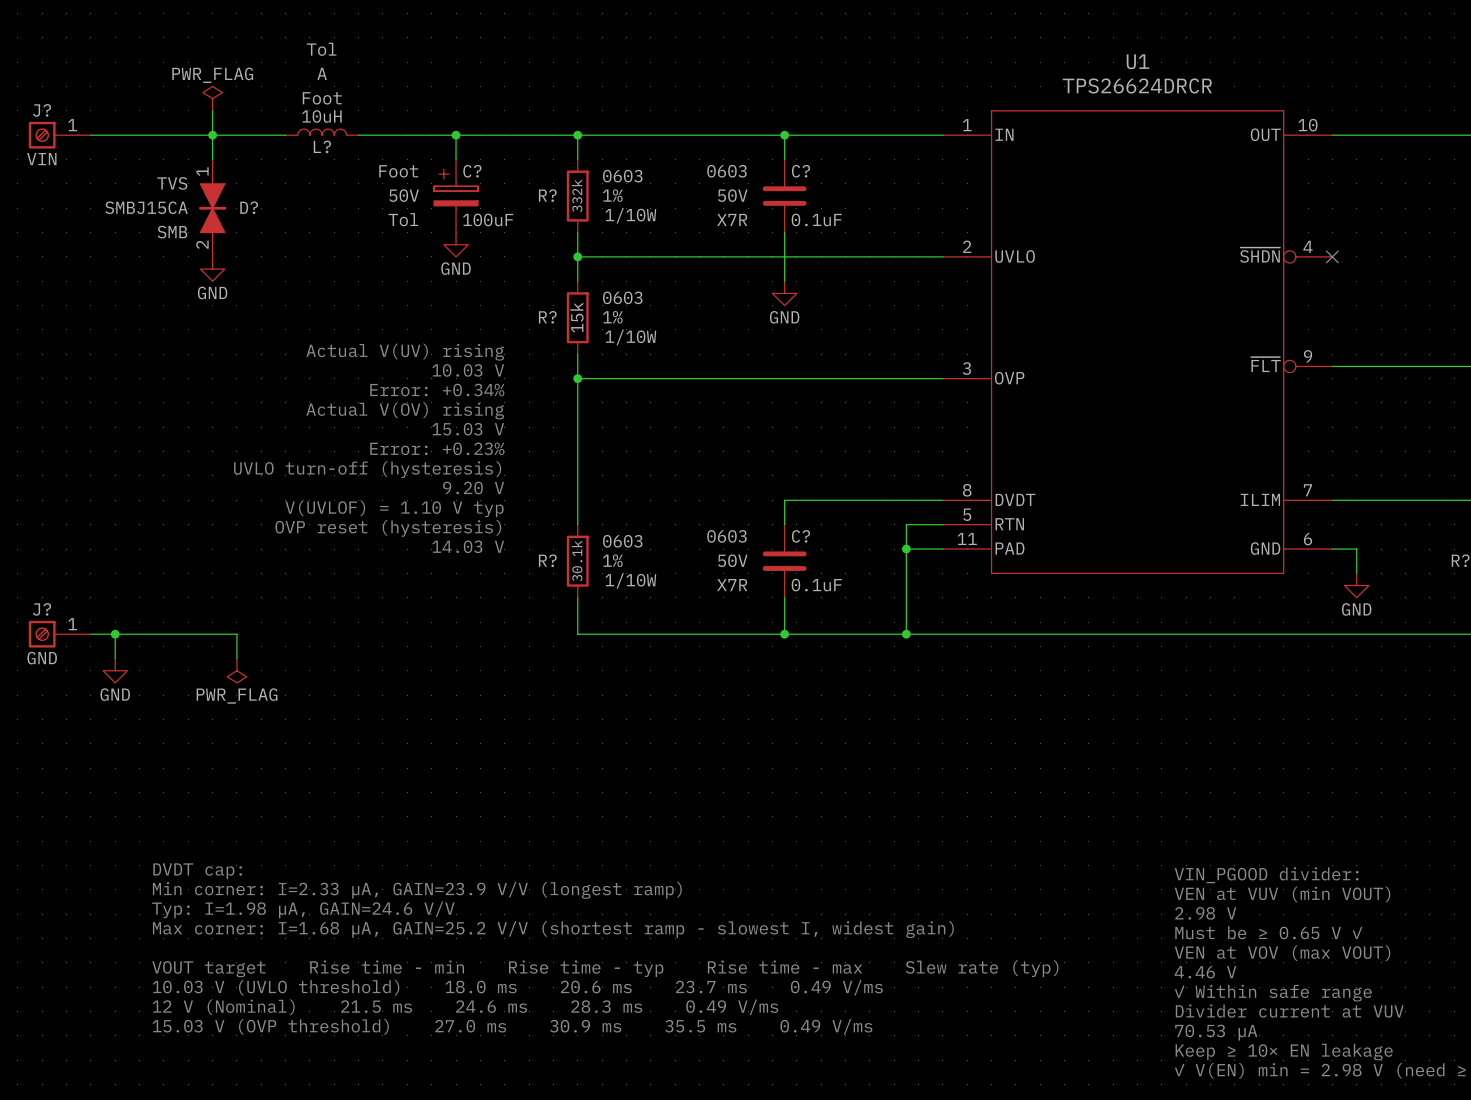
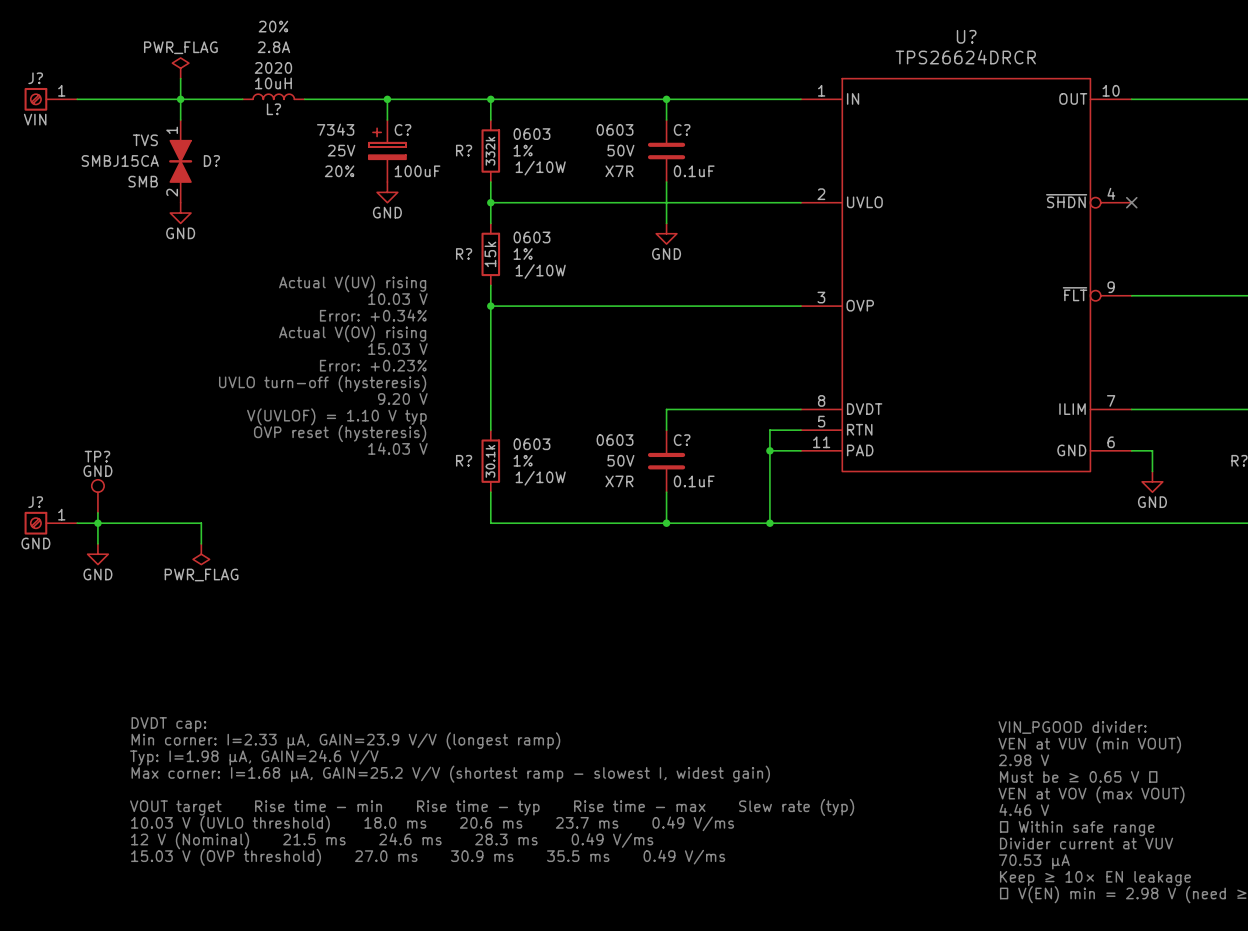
L? text: Tol (321, 49) -> 20% (273, 26)
U1 name: U1 (1137, 61) -> U? (966, 36)
L? text: A (322, 73) -> 2.8A (273, 47)
L? text: Foot (322, 98) -> 2020 (273, 67)
C? text: Foot (398, 171) -> 7343 (335, 129)
C? text: 50V (404, 195) -> 25V (341, 150)
C? text: Tol (403, 219) -> 20% (339, 171)
TP?: none -> GND (97, 496)
wire: none -> (97, 512) (97, 523)

